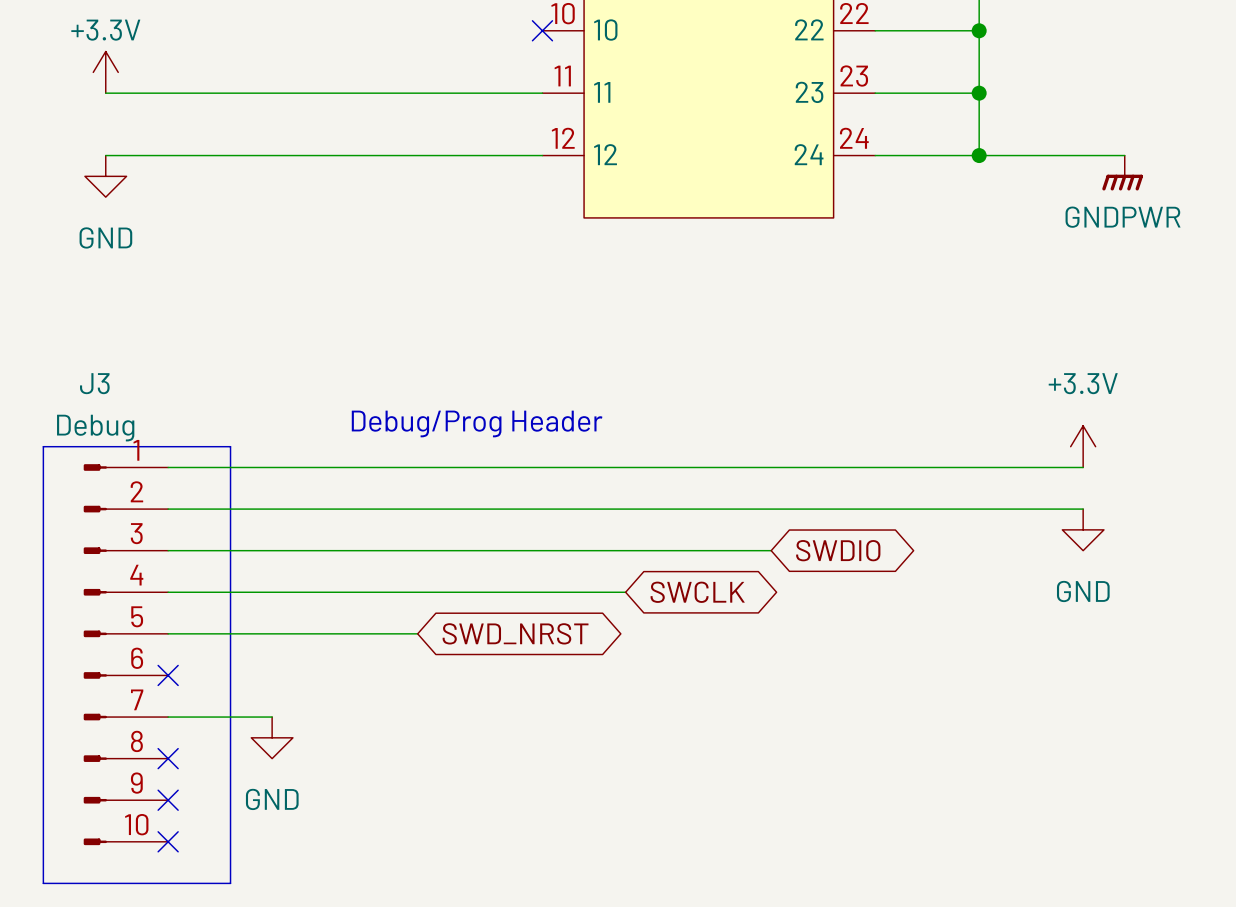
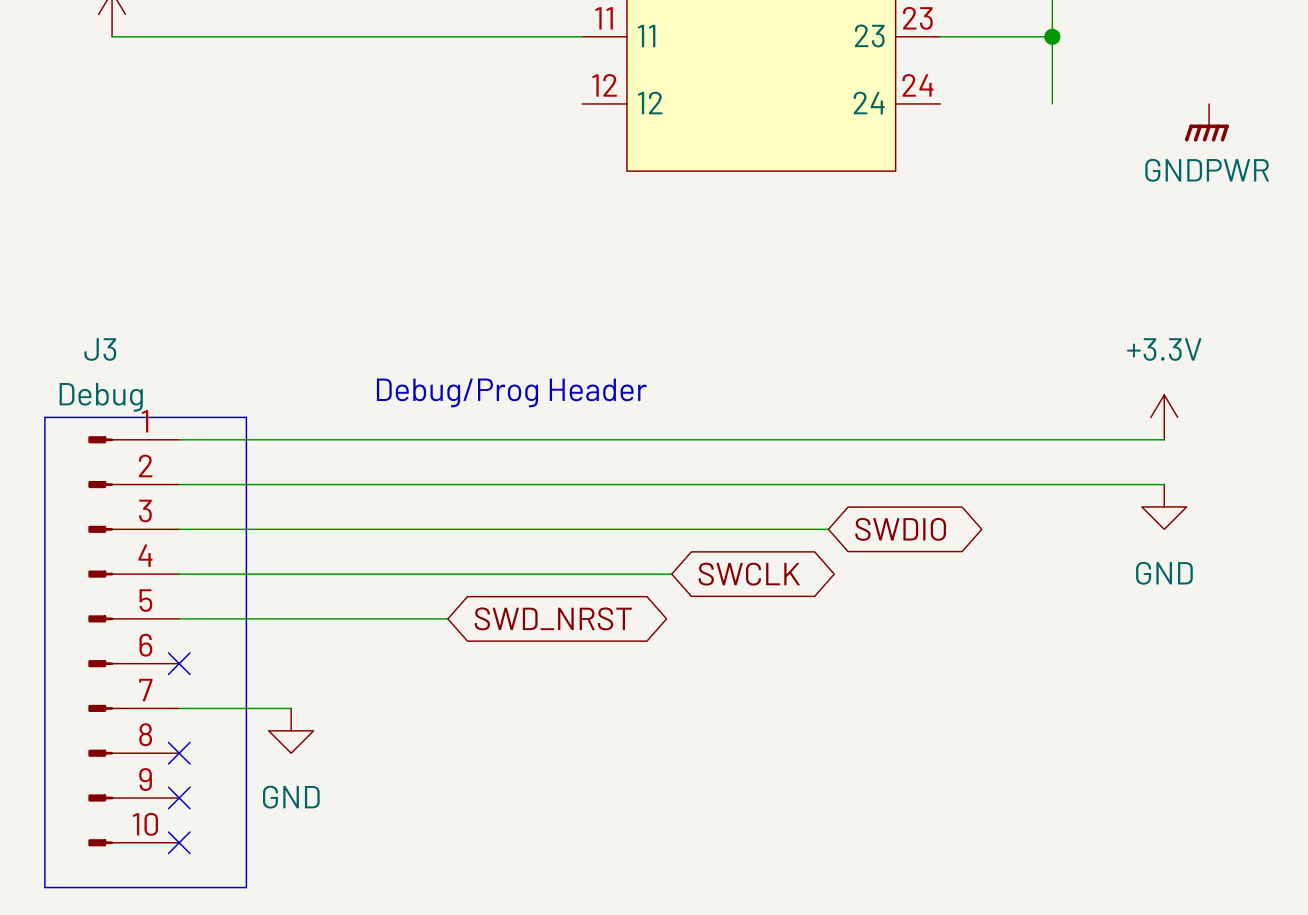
wire: (105, 155) (542, 155) -> none
wire: (875, 155) (1124, 155) -> none
junction: (979, 155) -> none
power symbol: GND (105, 176) -> none

